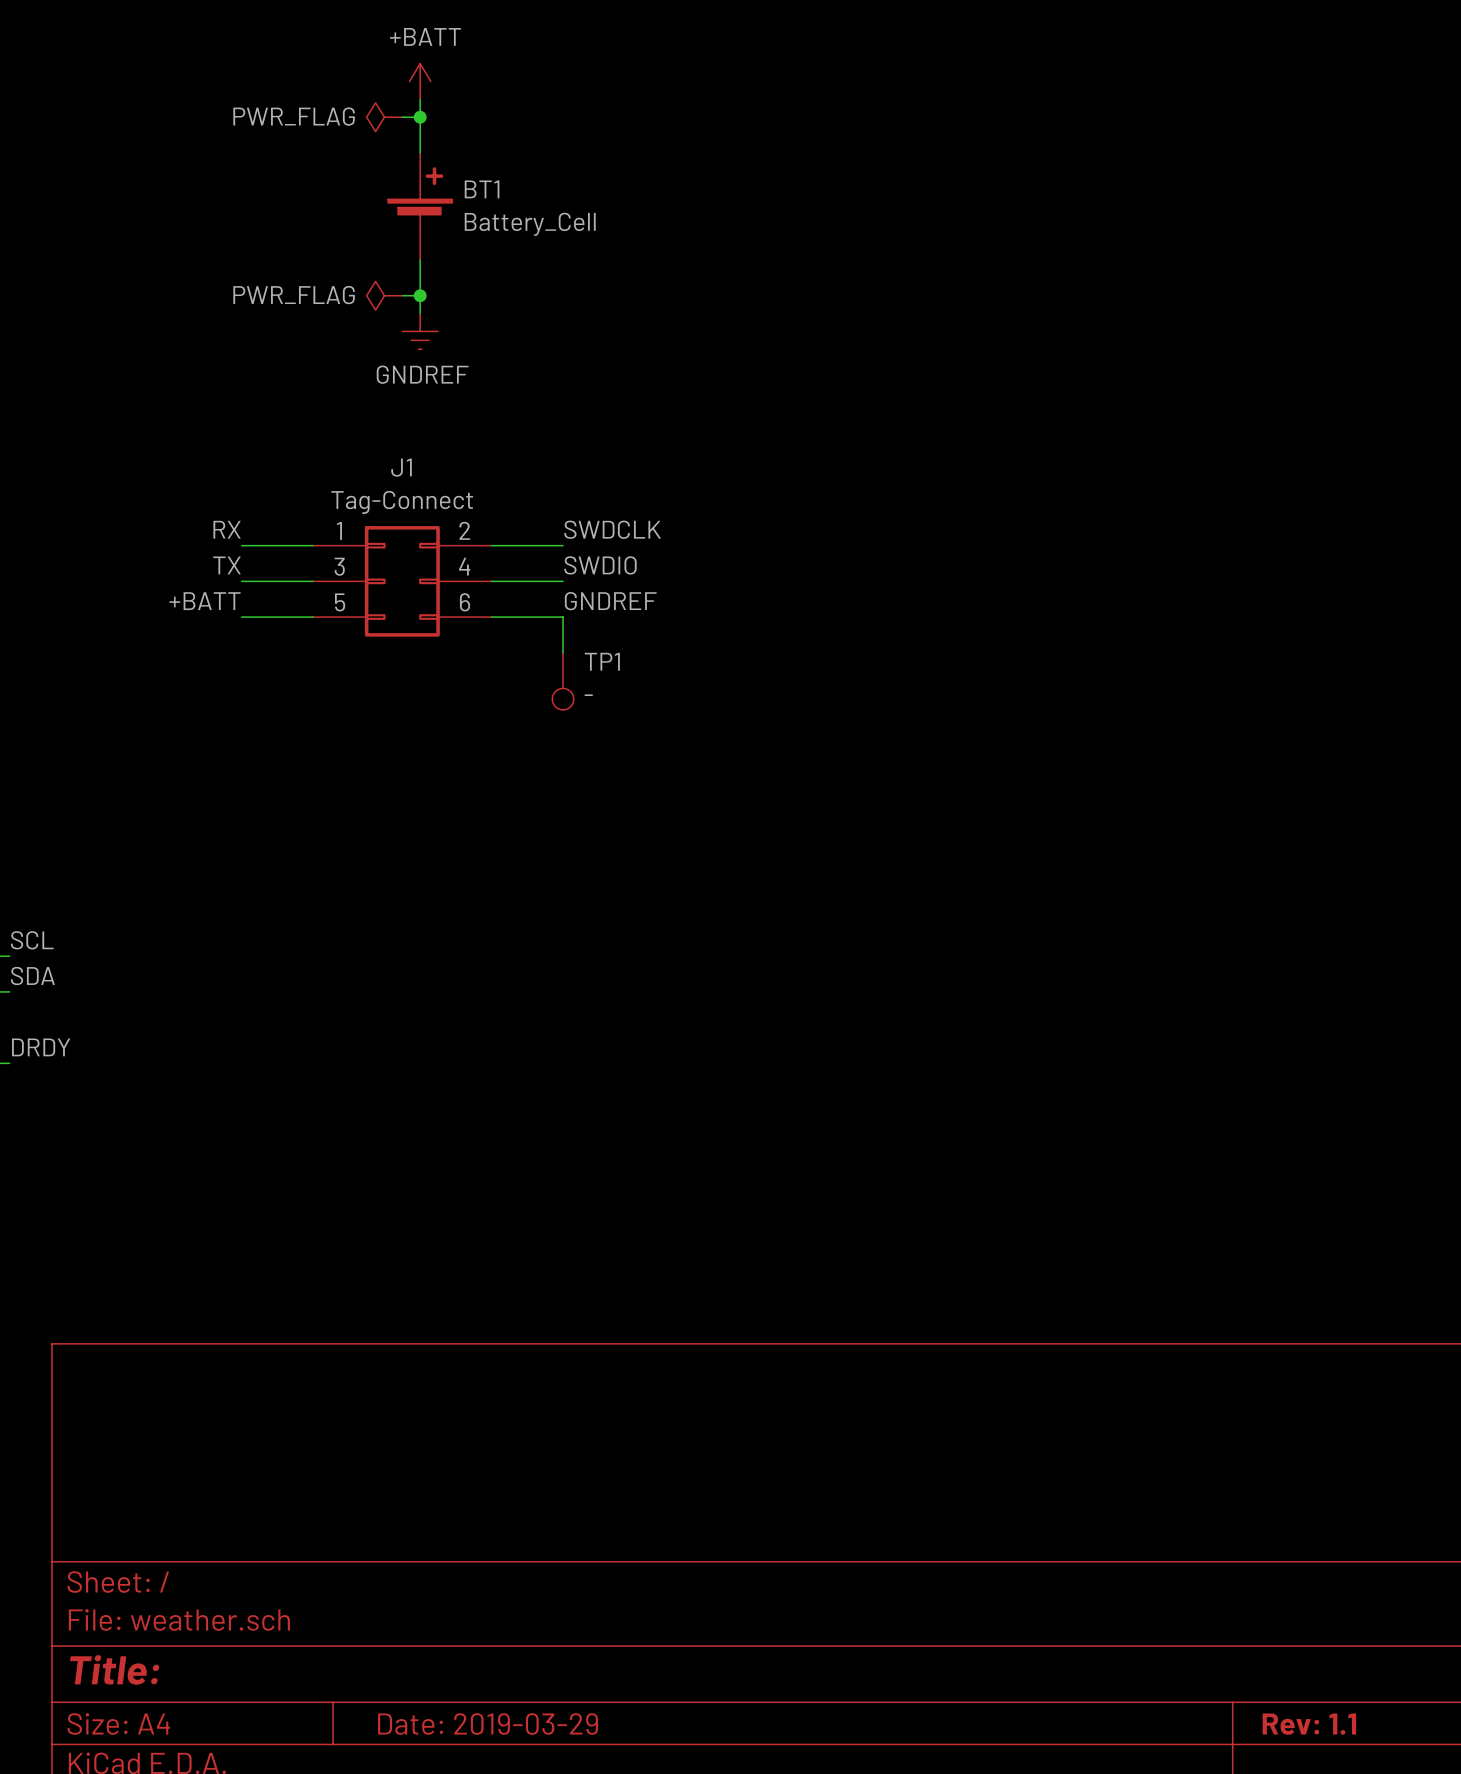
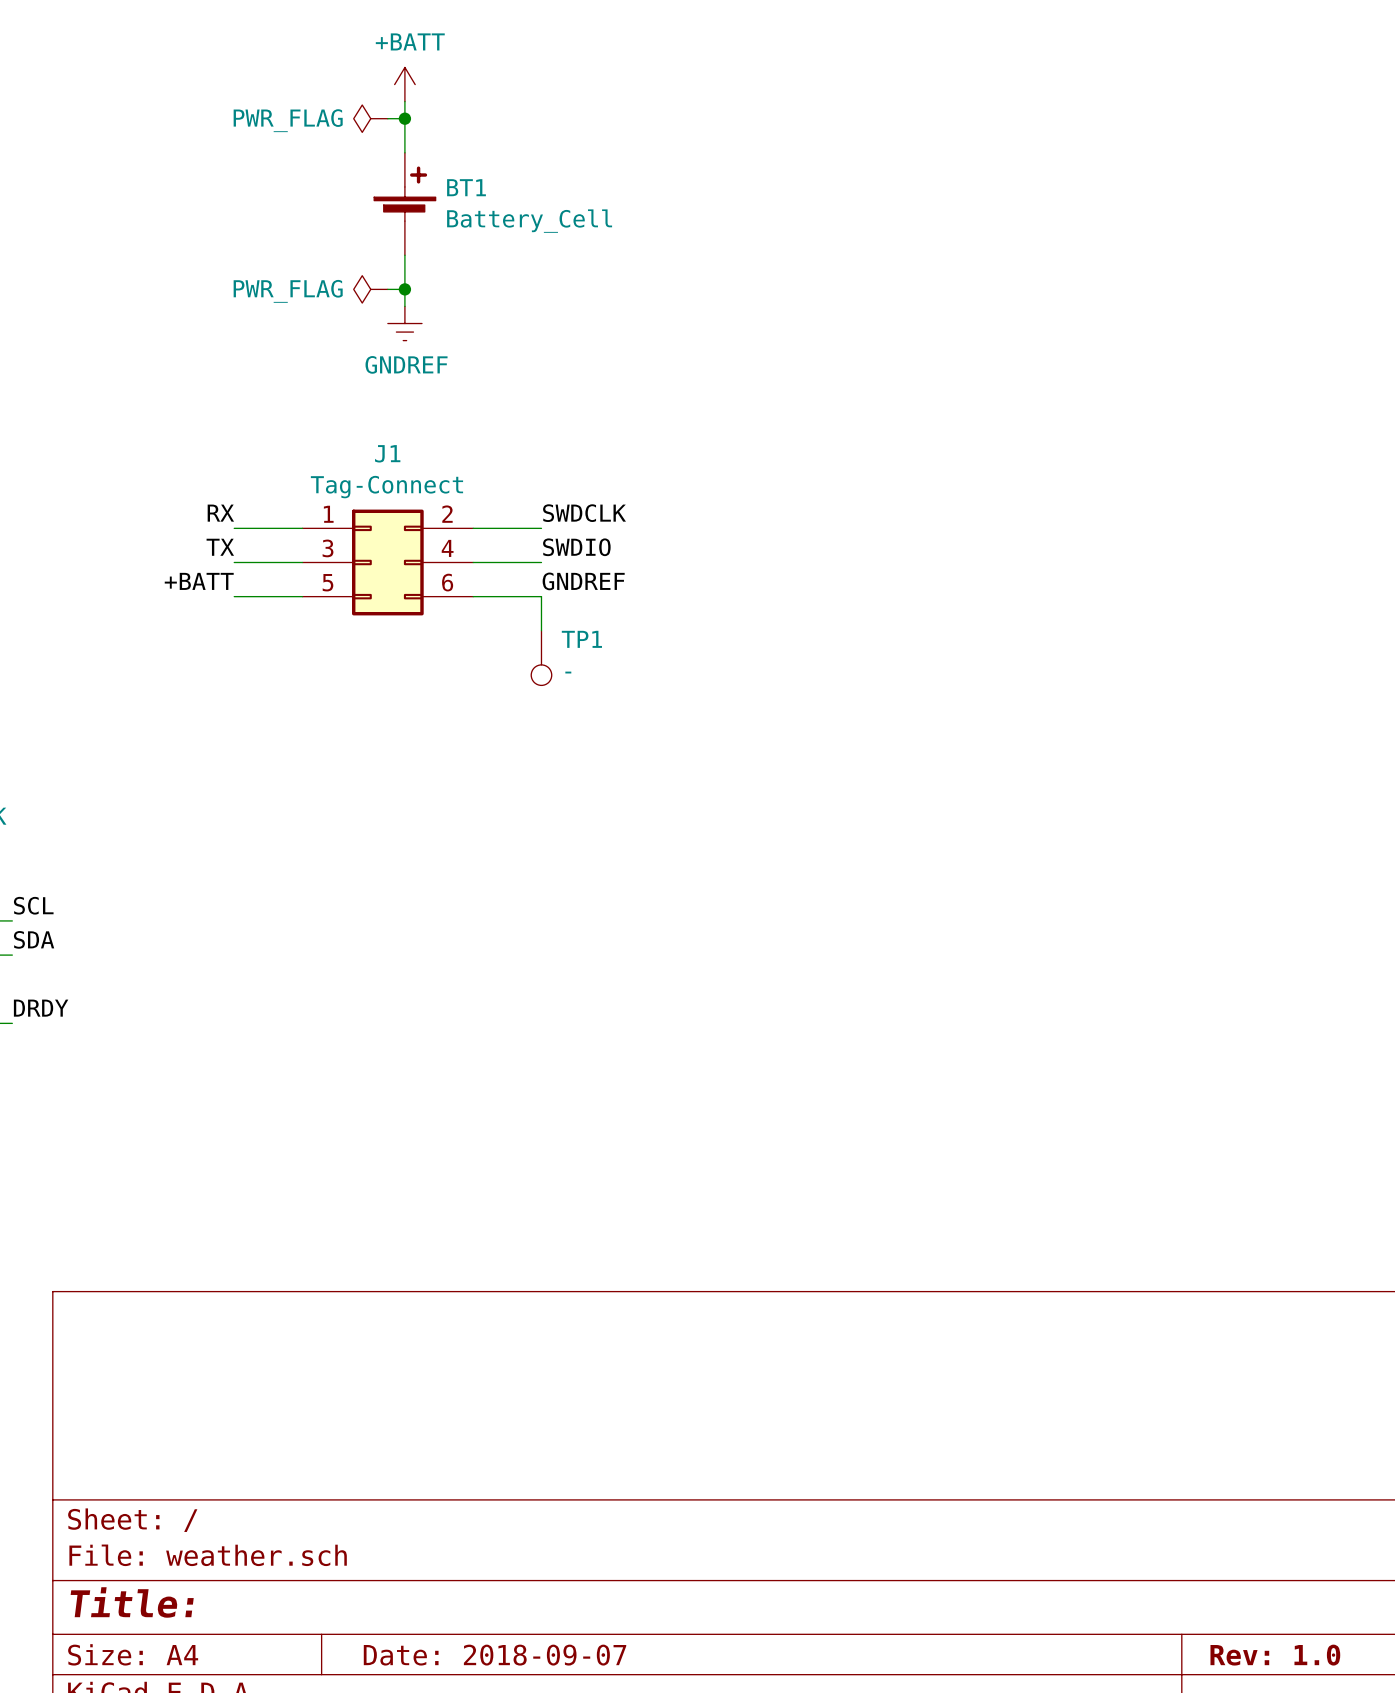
title block: Date: 2019-03-29 (488, 1724) -> Date: 2018-09-07 (495, 1655)
title block: Rev: 1.1 (1309, 1724) -> Rev: 1.0 (1275, 1655)

